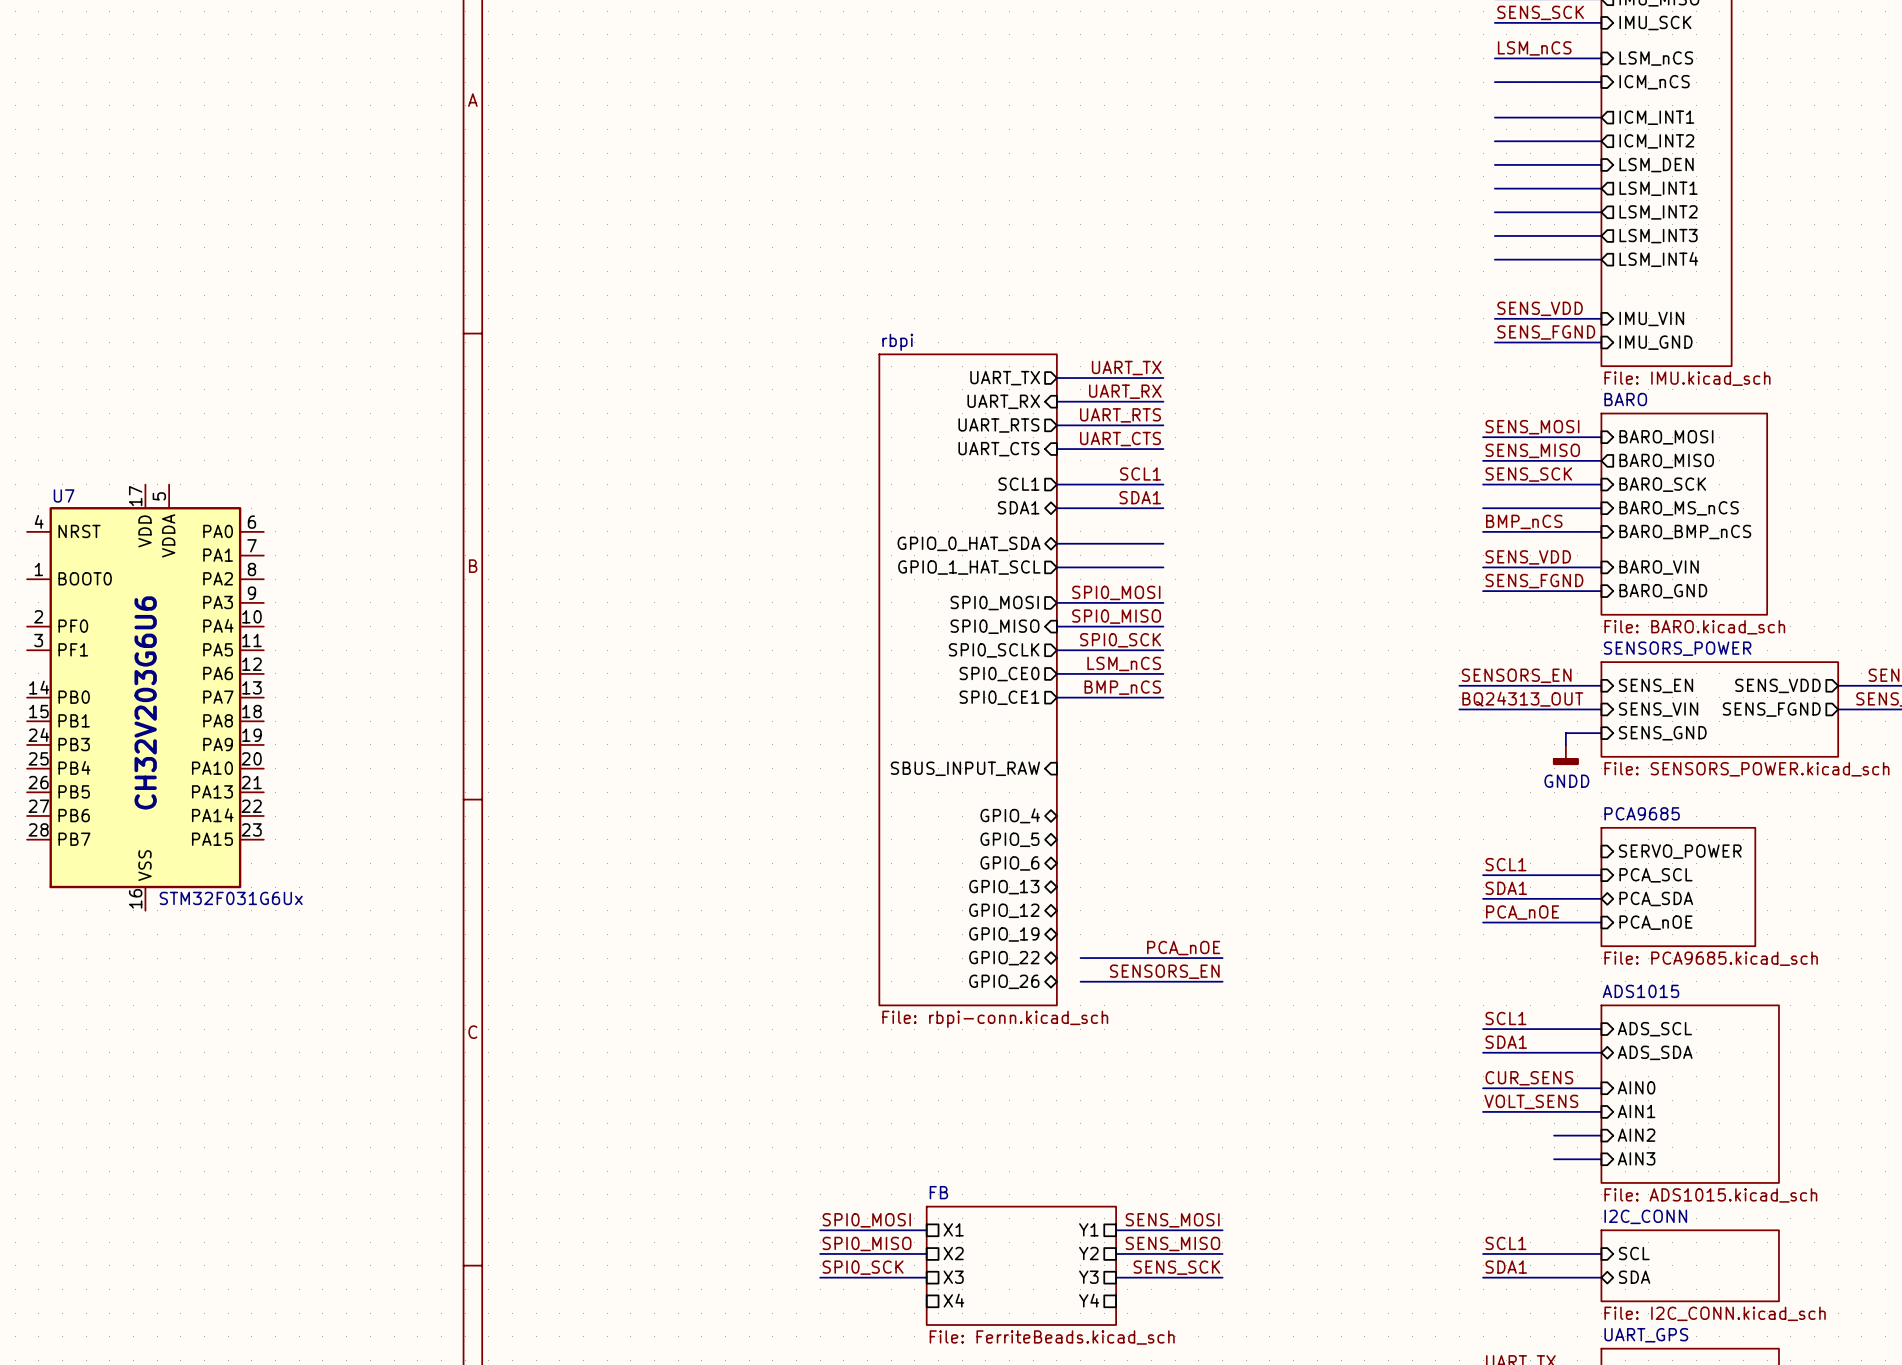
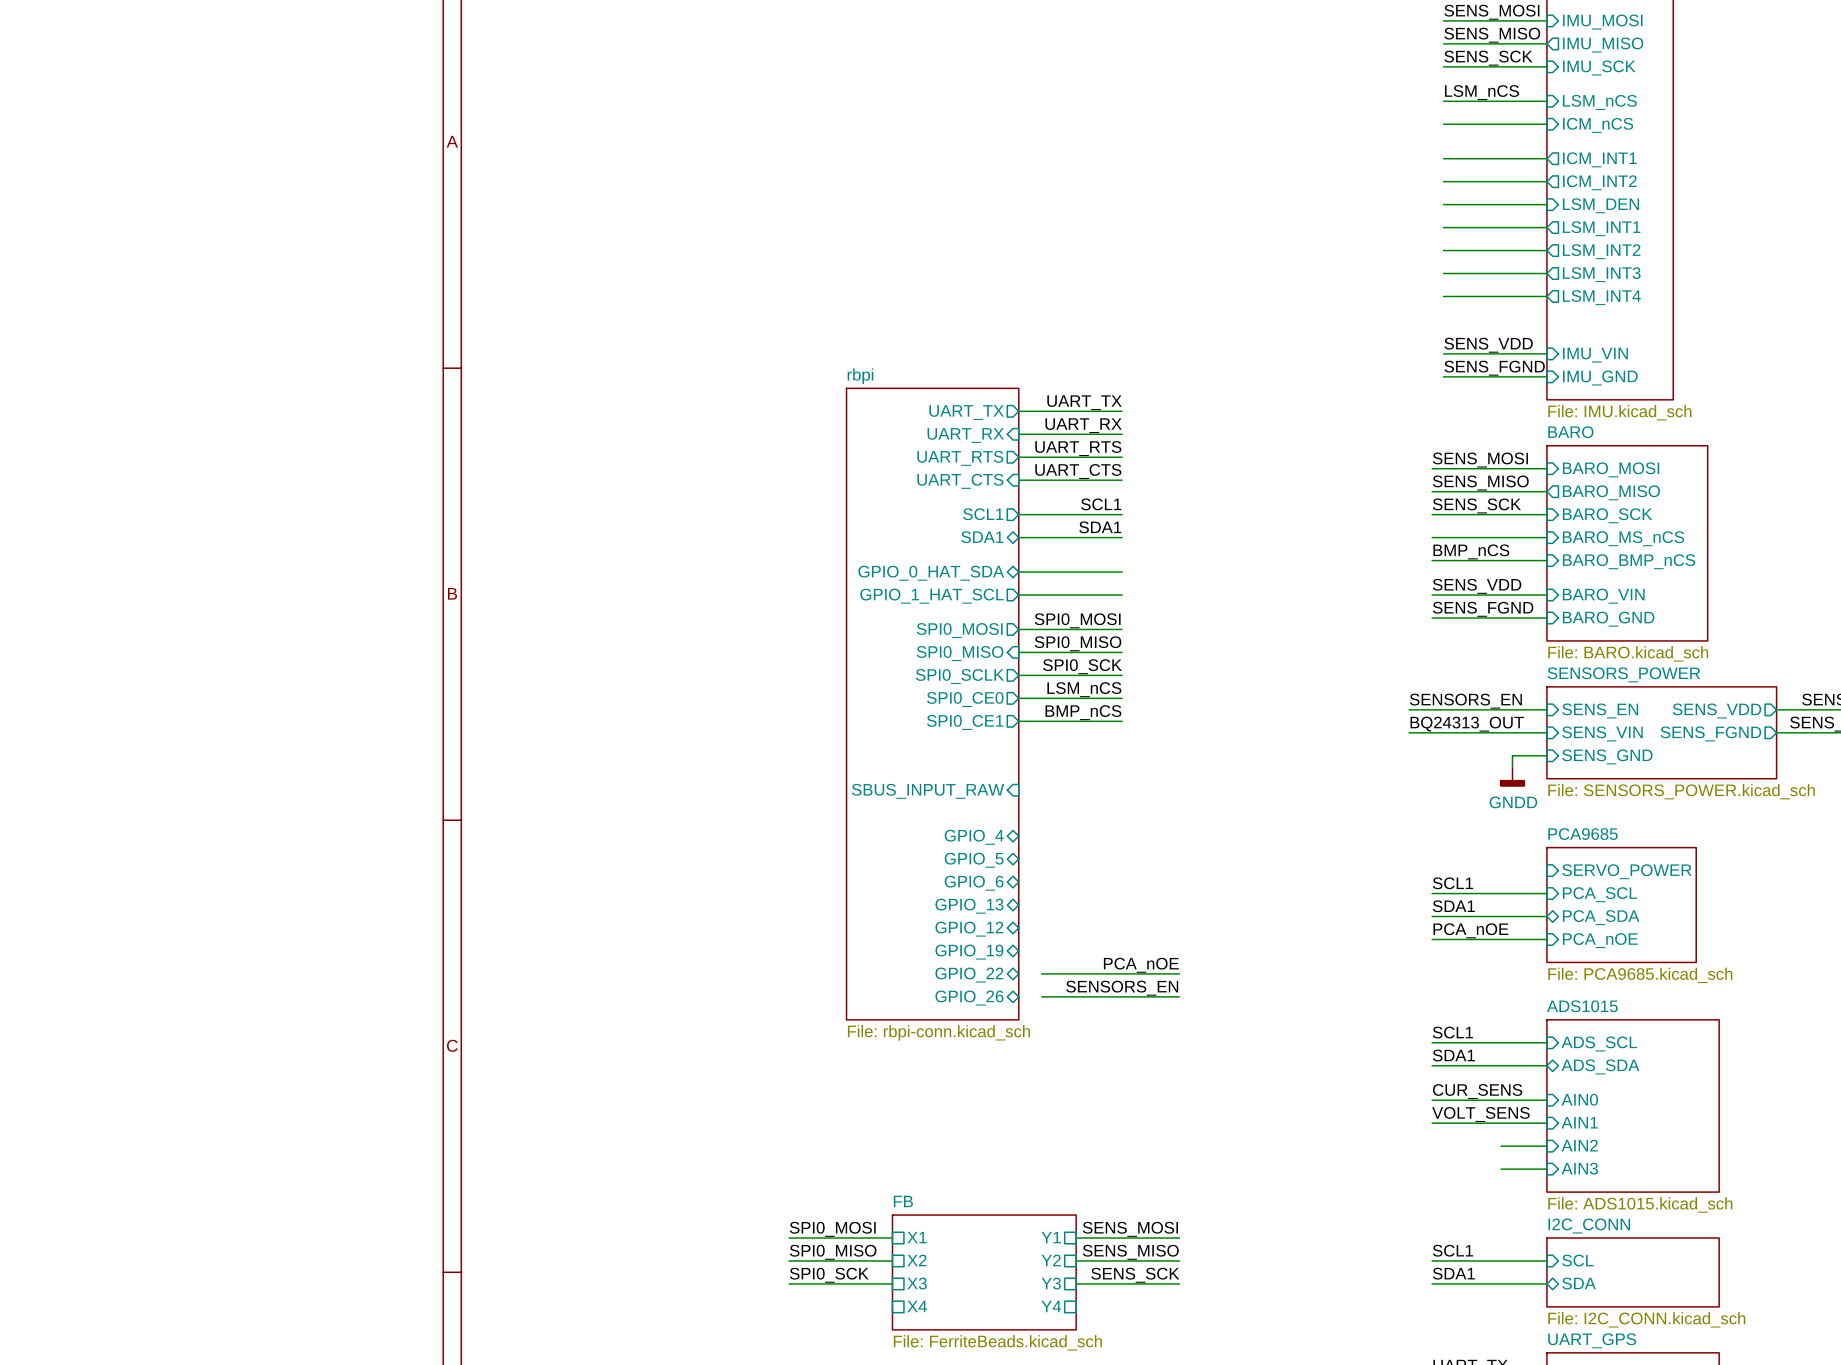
U7: STM32F031G6Ux (145, 697) -> none
text: CH32V203G6U6 (145, 702) -> none

